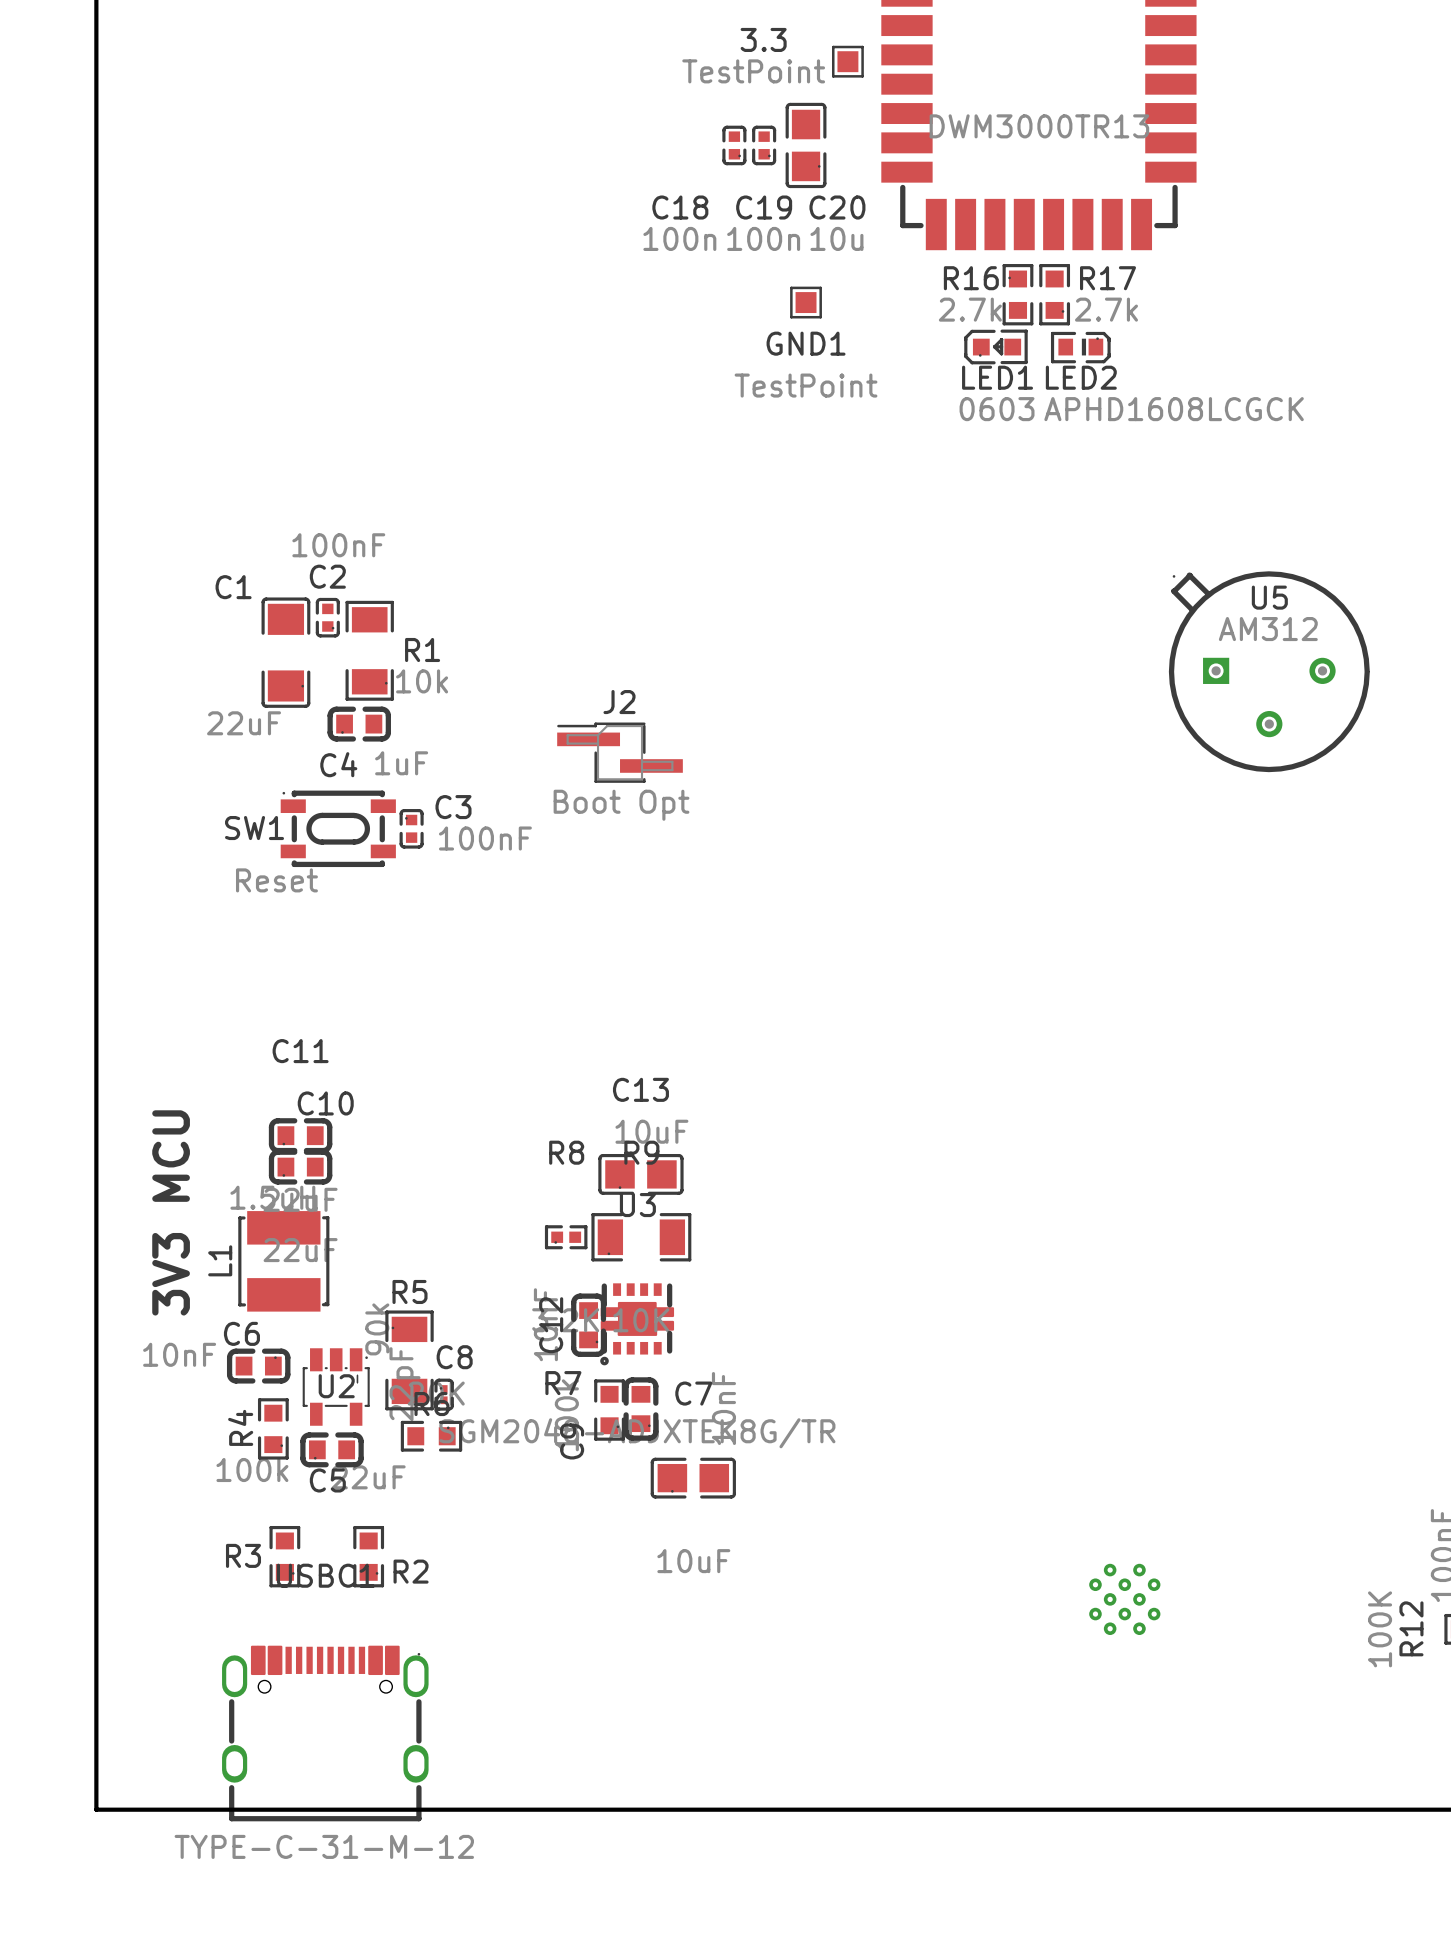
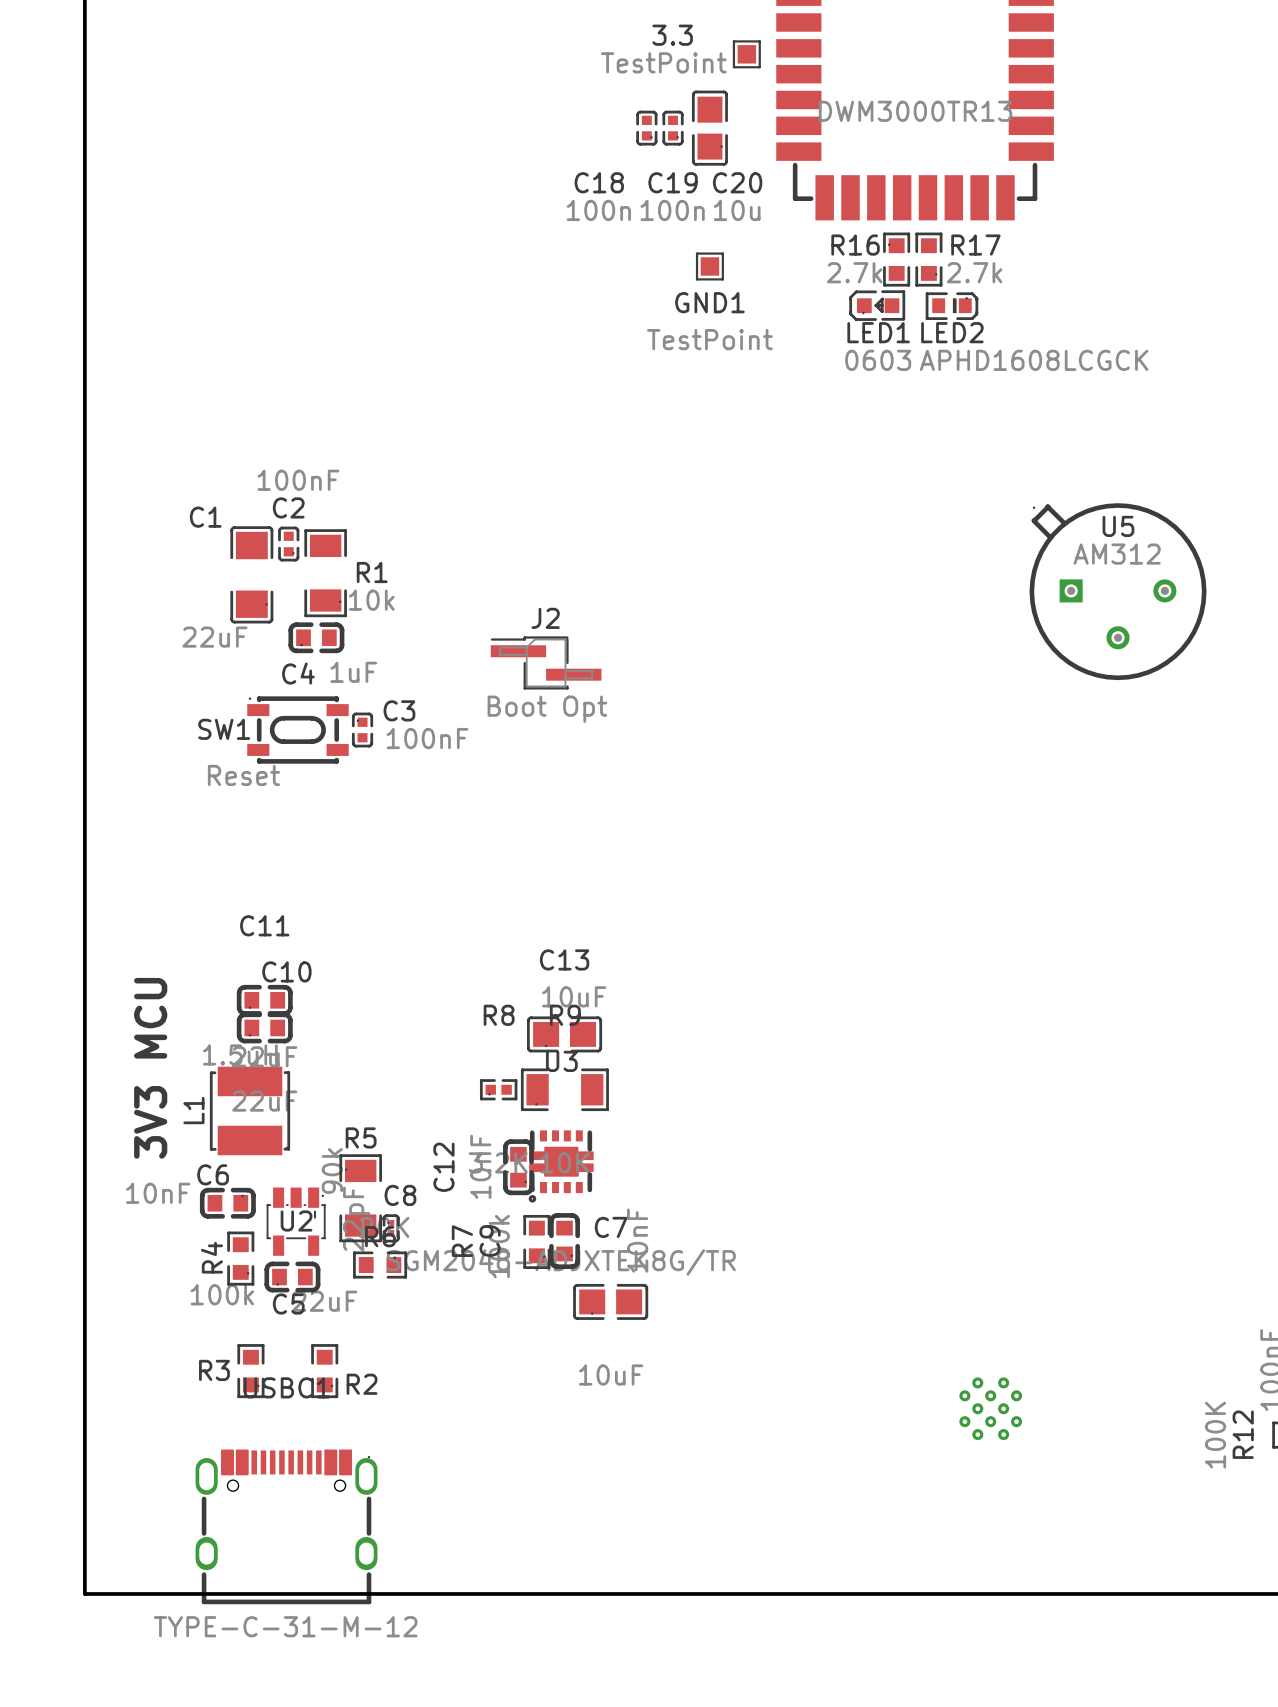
C12 name position: C12 (551, 1325) -> C12 (443, 1167)
R7 name rotation: 0° (563, 1383) -> 90° counterclockwise (462, 1241)
C9 name position: C9 (572, 1441) -> C9 (490, 1241)

